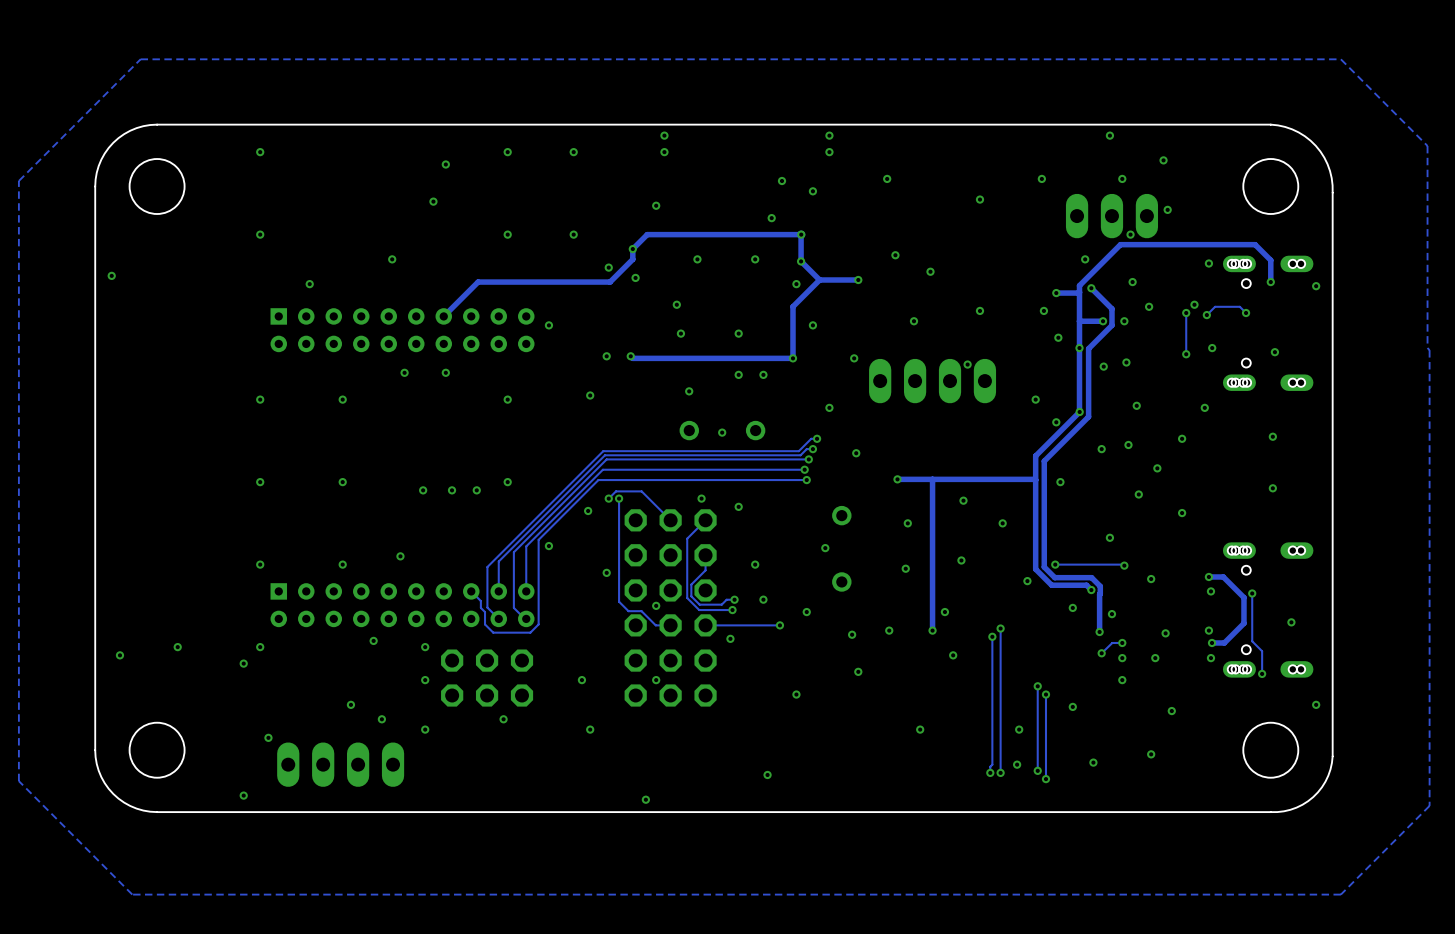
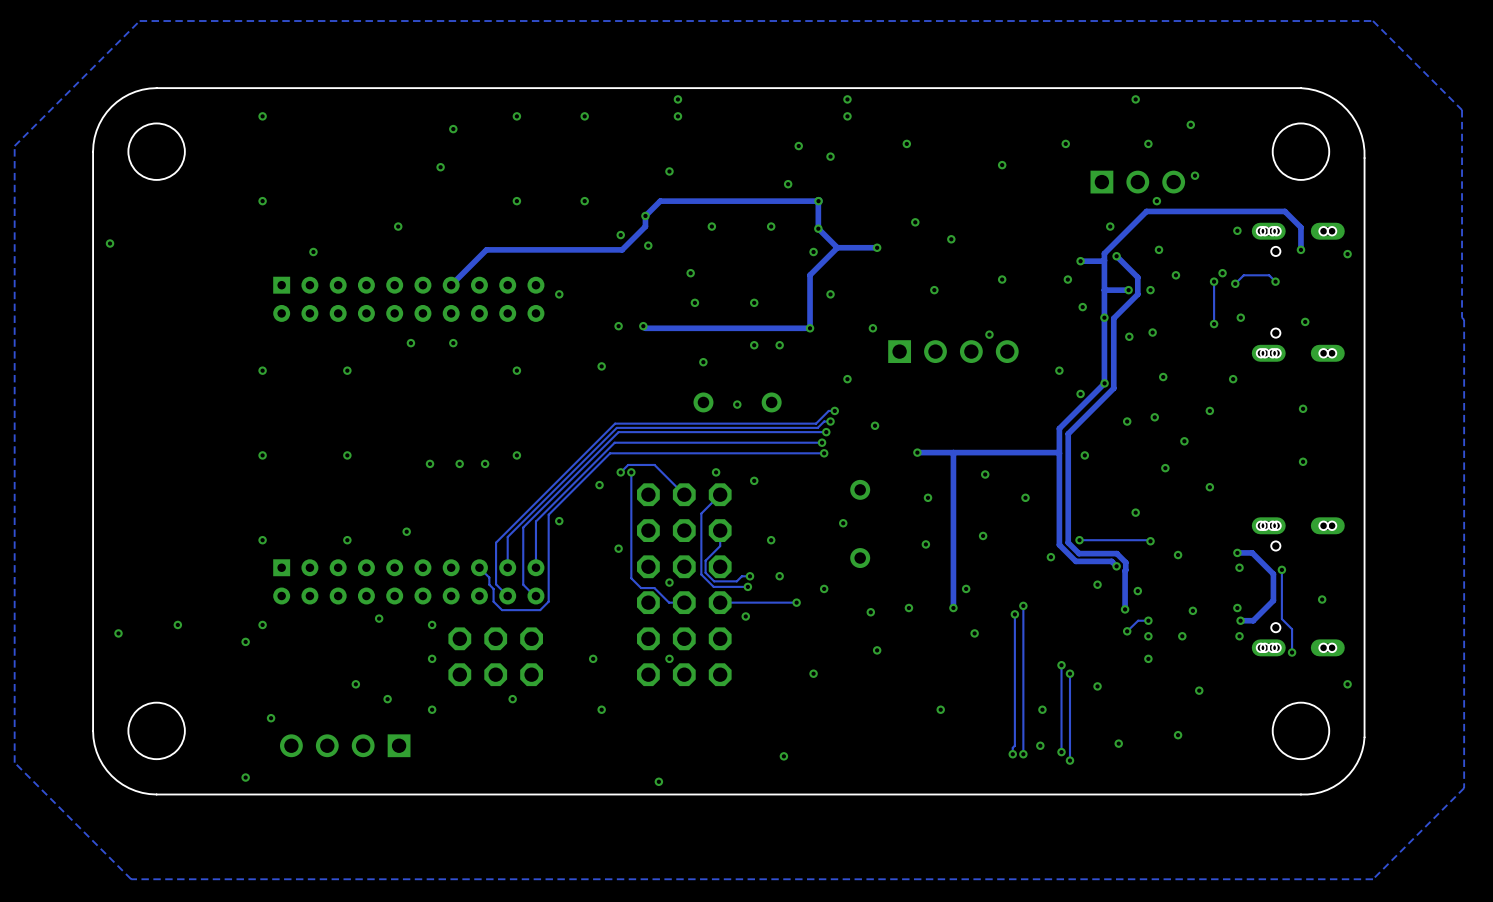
part footprint: [1065, 193, 1159, 239] -> [1090, 170, 1186, 194]
part footprint: [869, 358, 997, 404] -> [888, 340, 1019, 364]
part footprint: [277, 742, 405, 787] -> [280, 734, 411, 758]

